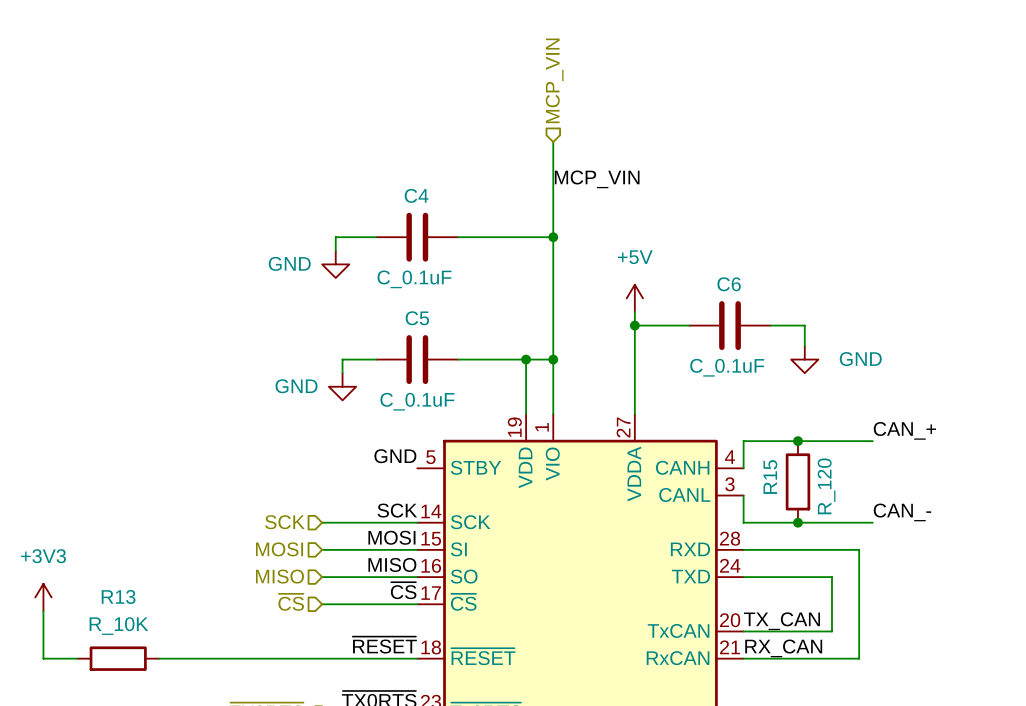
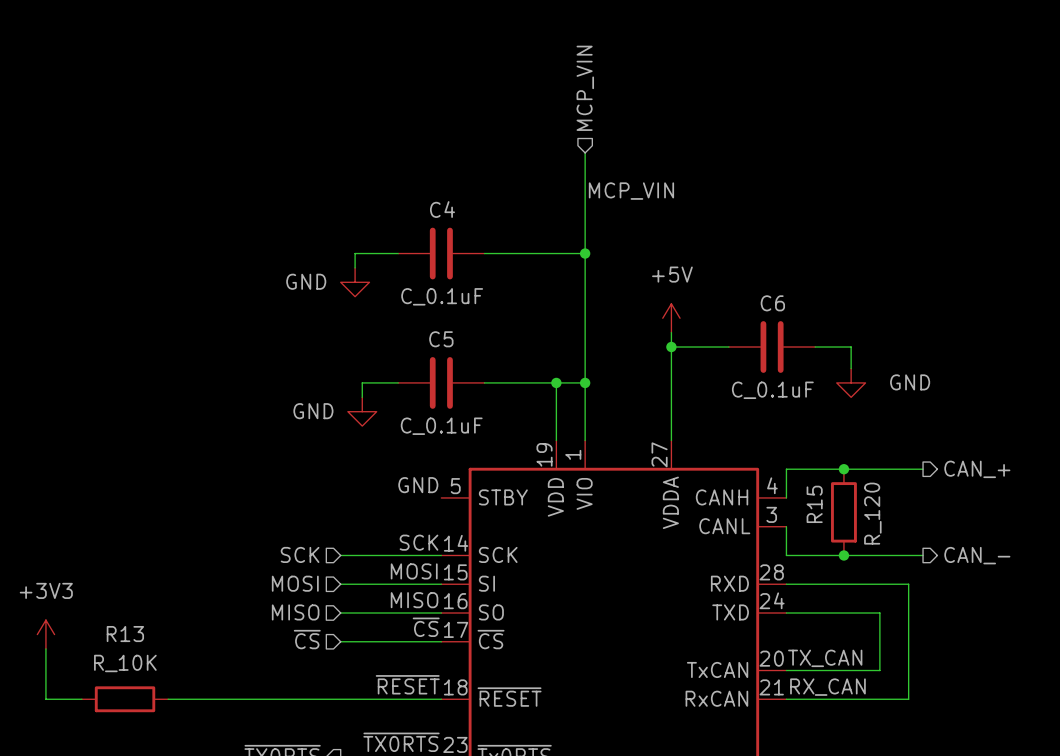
label: CAN_+ (904, 430) -> none
hierarchical label: none -> CAN_+ (977, 469)
label: CAN_- (902, 512) -> none
hierarchical label: none -> CAN_- (977, 555)

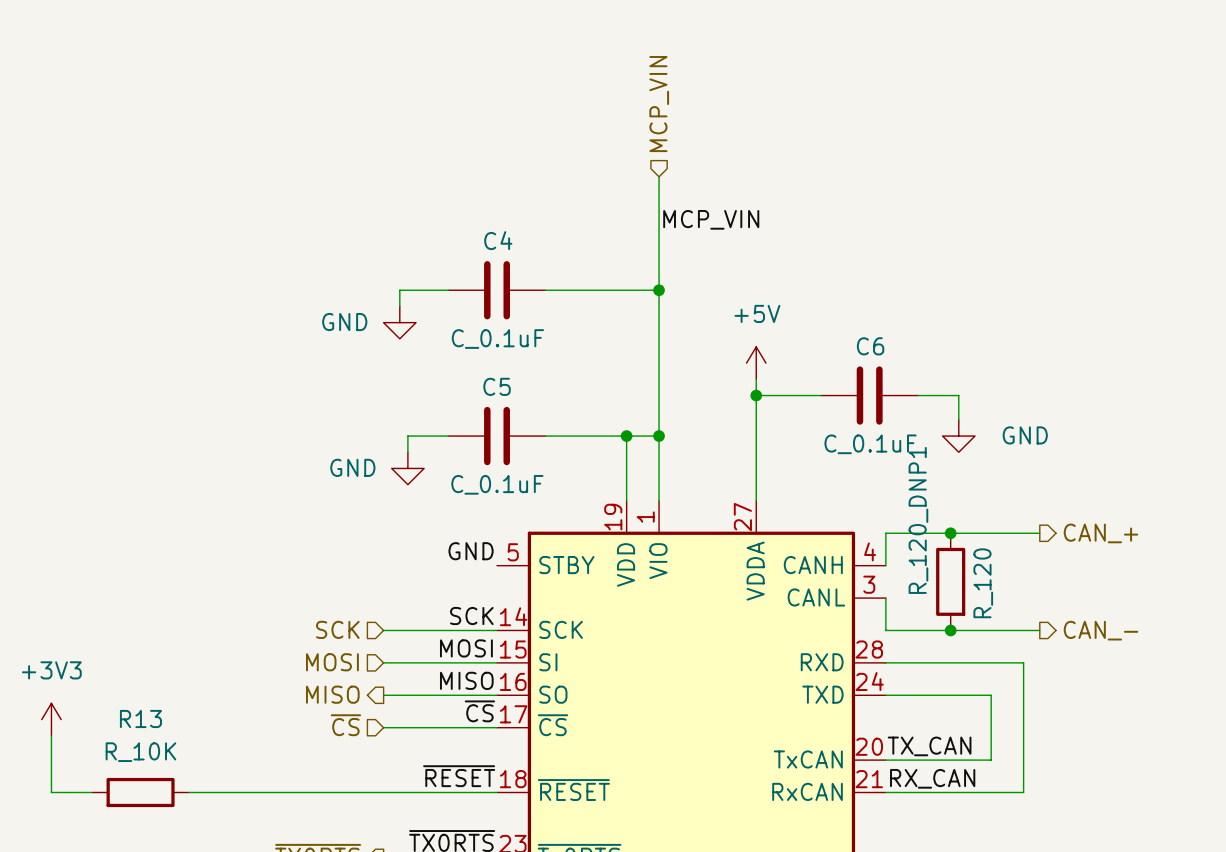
R15 name: R15 (814, 504) -> R_120_DNP1 (918, 520)
hierarchical label shape: input (295, 612) -> output (332, 694)

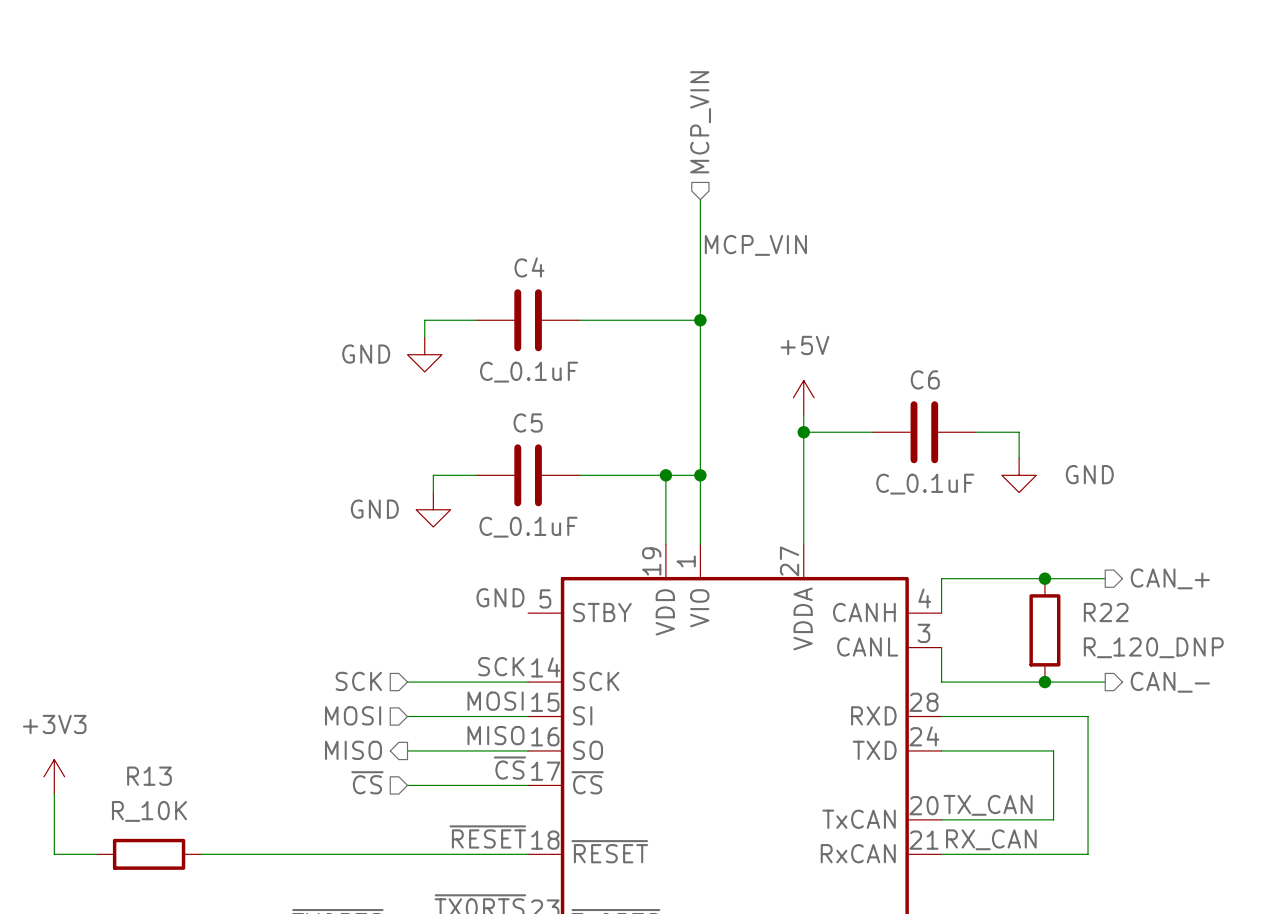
junction position: (950, 533) -> (1044, 578)
R_120_DNP1: R_120 (950, 581) -> none
R22: none -> R_120_DNP (1044, 630)
junction position: (950, 630) -> (1044, 682)

